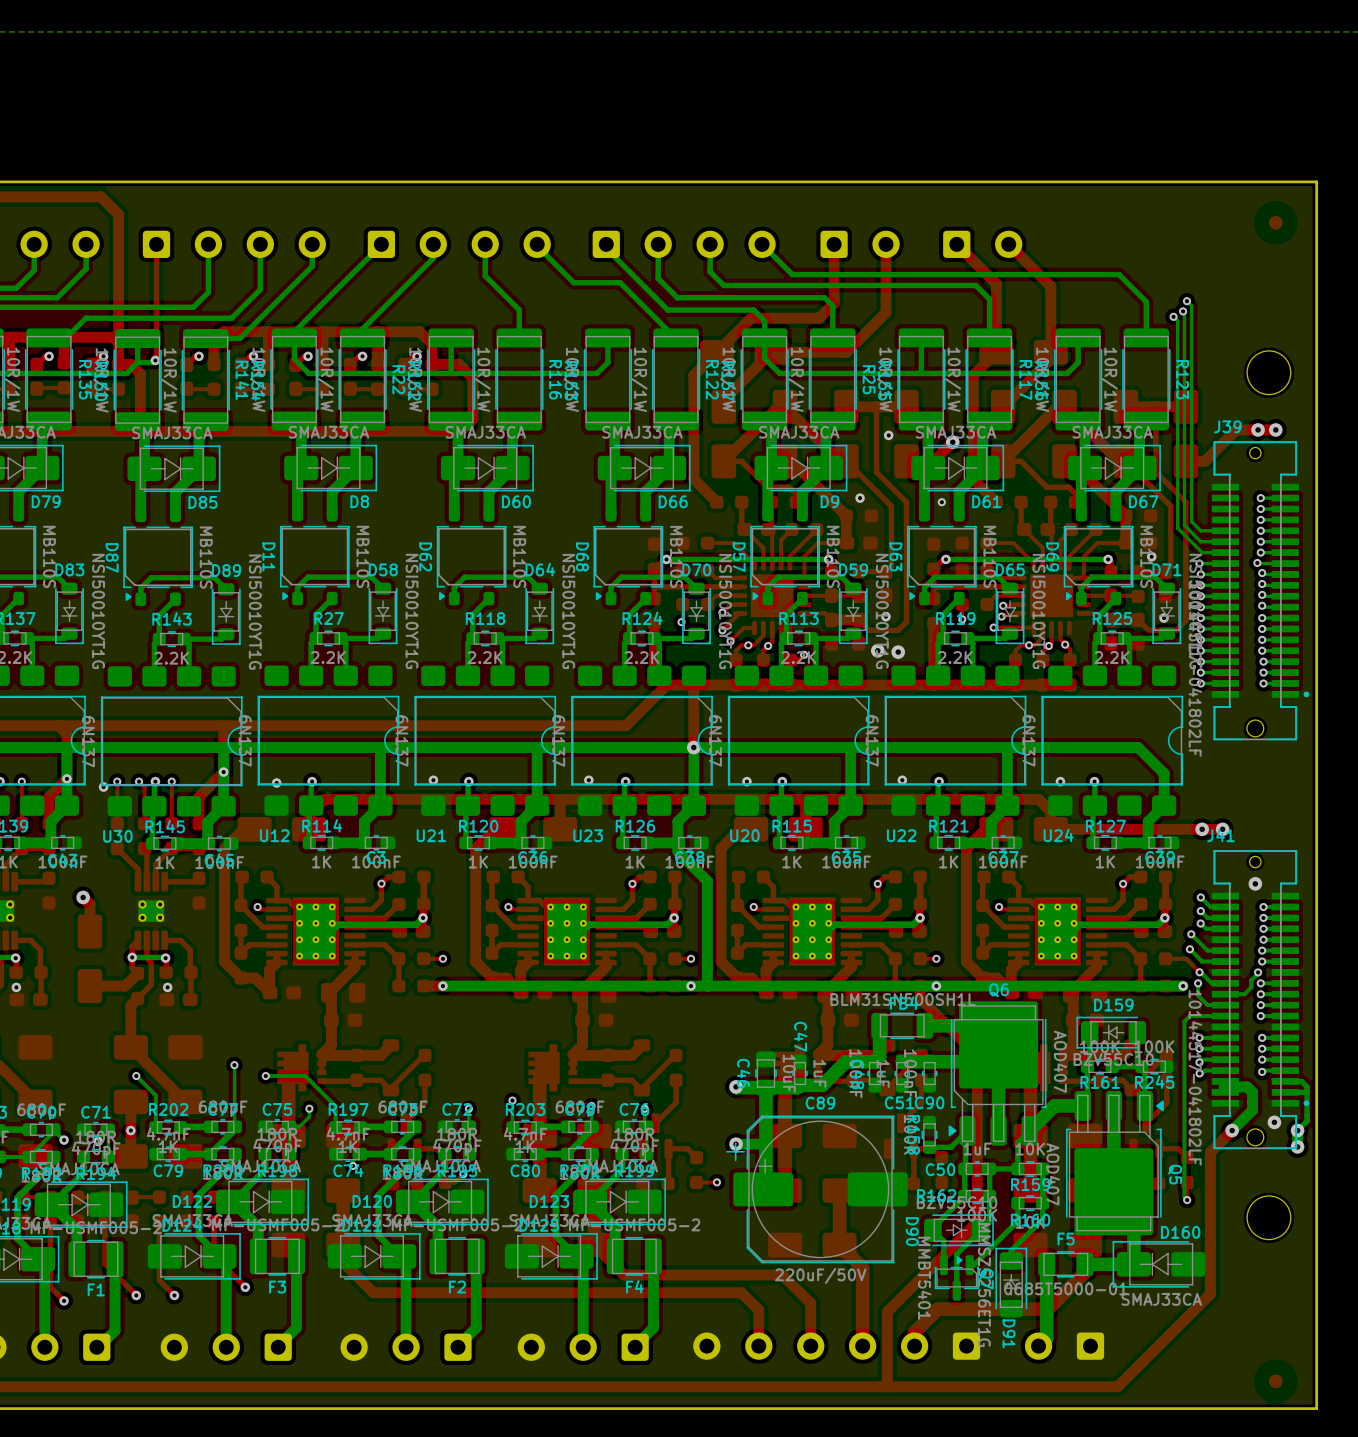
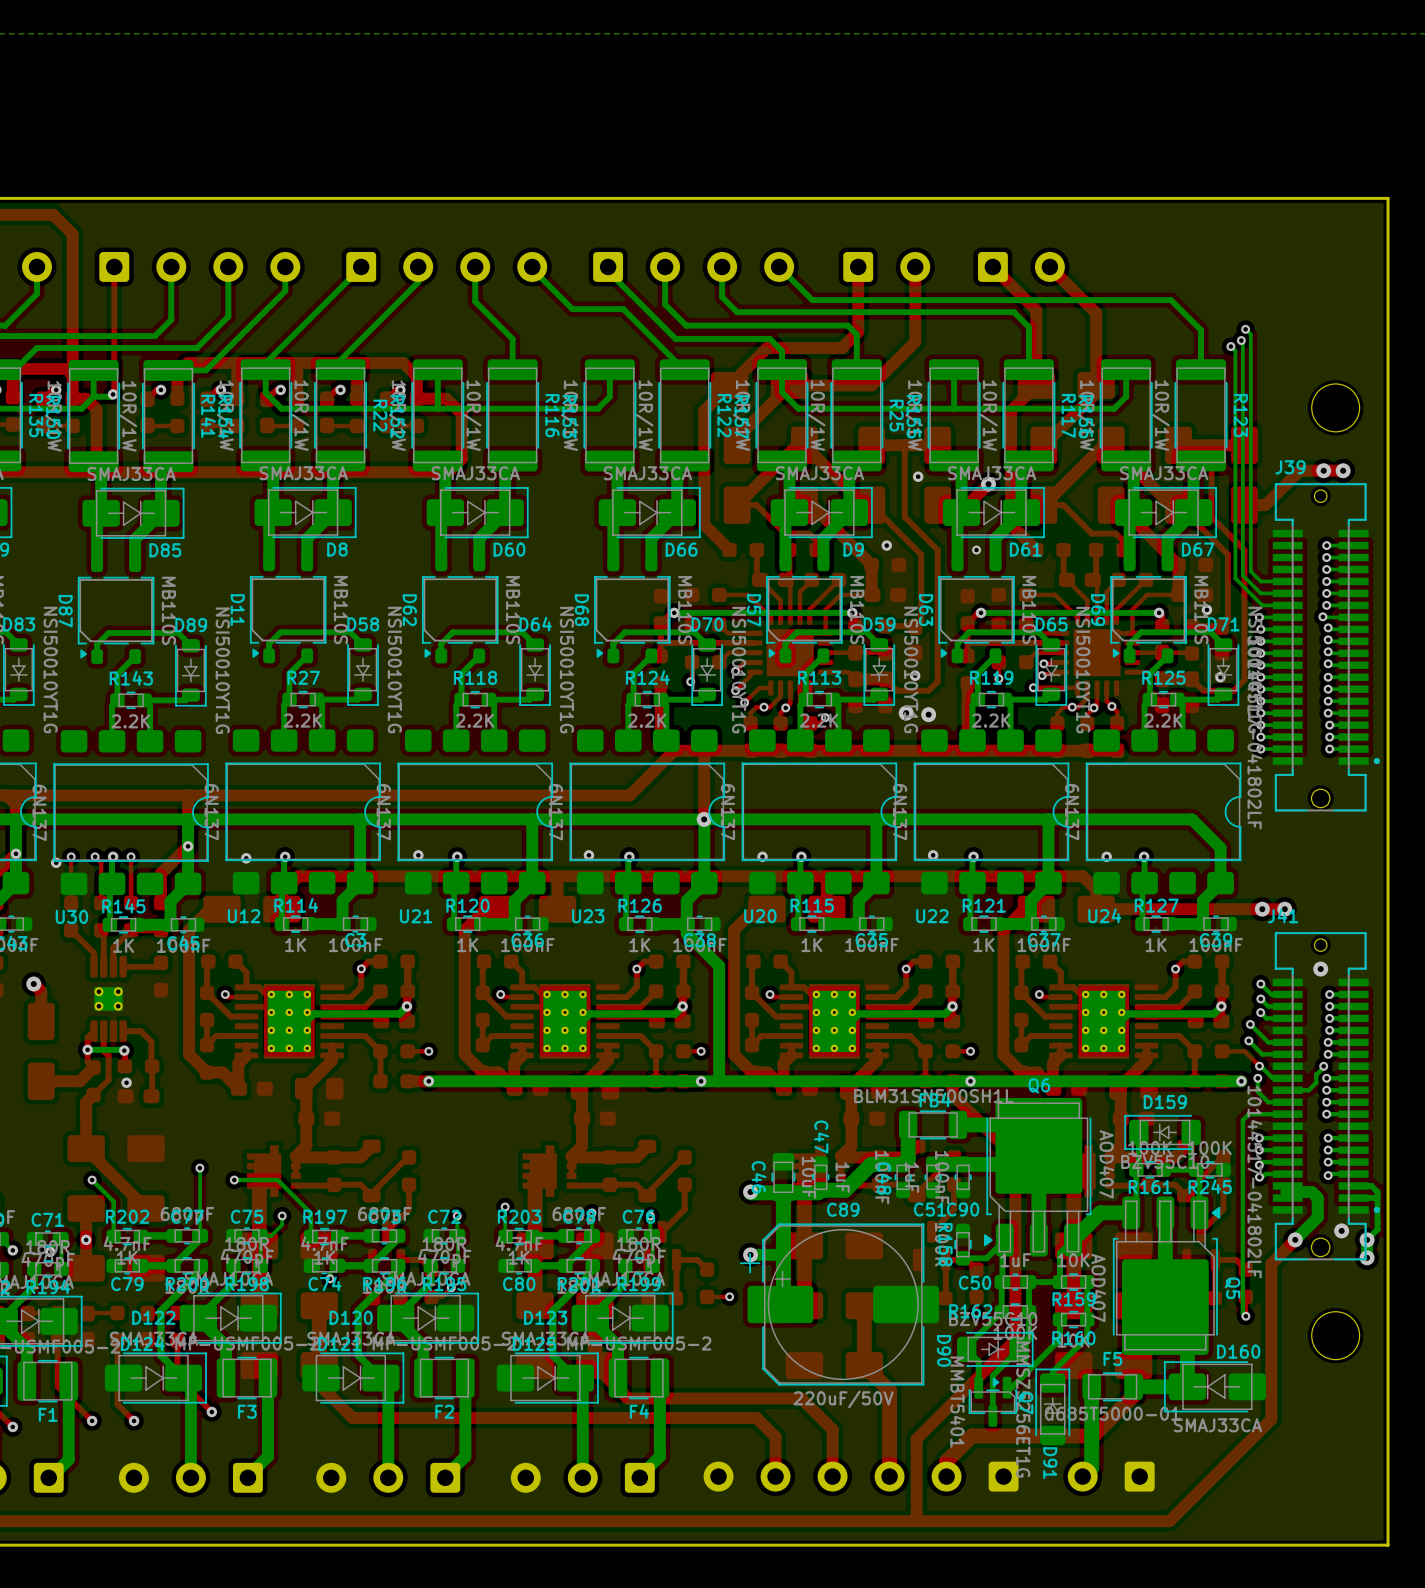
part: (1275, 222) -> none
part: (1275, 1381) -> none

